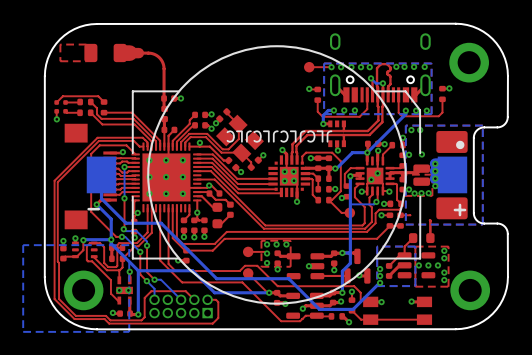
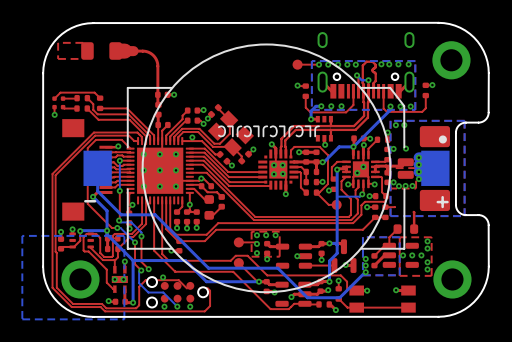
bottom track: (154, 279) (160, 279) (181, 299) -> none
bottom track: none -> (139, 271) (139, 283) (148, 292) (163, 292) (177, 306)
bottom track: (146, 281) (154, 288) (154, 299) -> none
via: none -> (163, 277)
part footprint: [149, 294, 213, 319] -> [147, 277, 209, 308]
via: none -> (164, 306)
via: none -> (177, 306)
via: none -> (190, 306)

